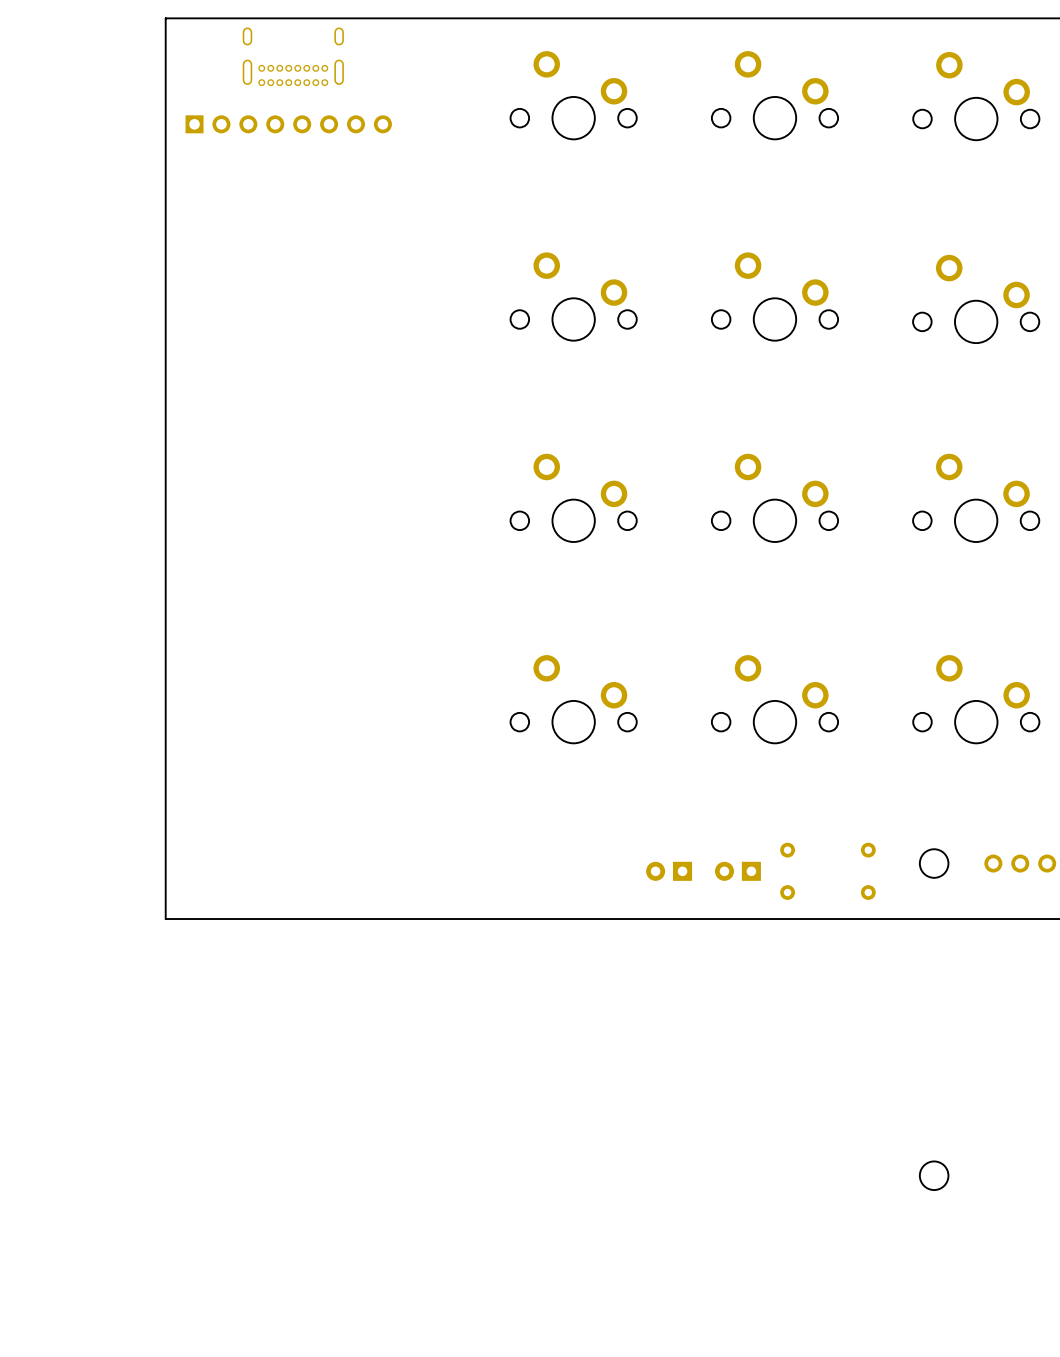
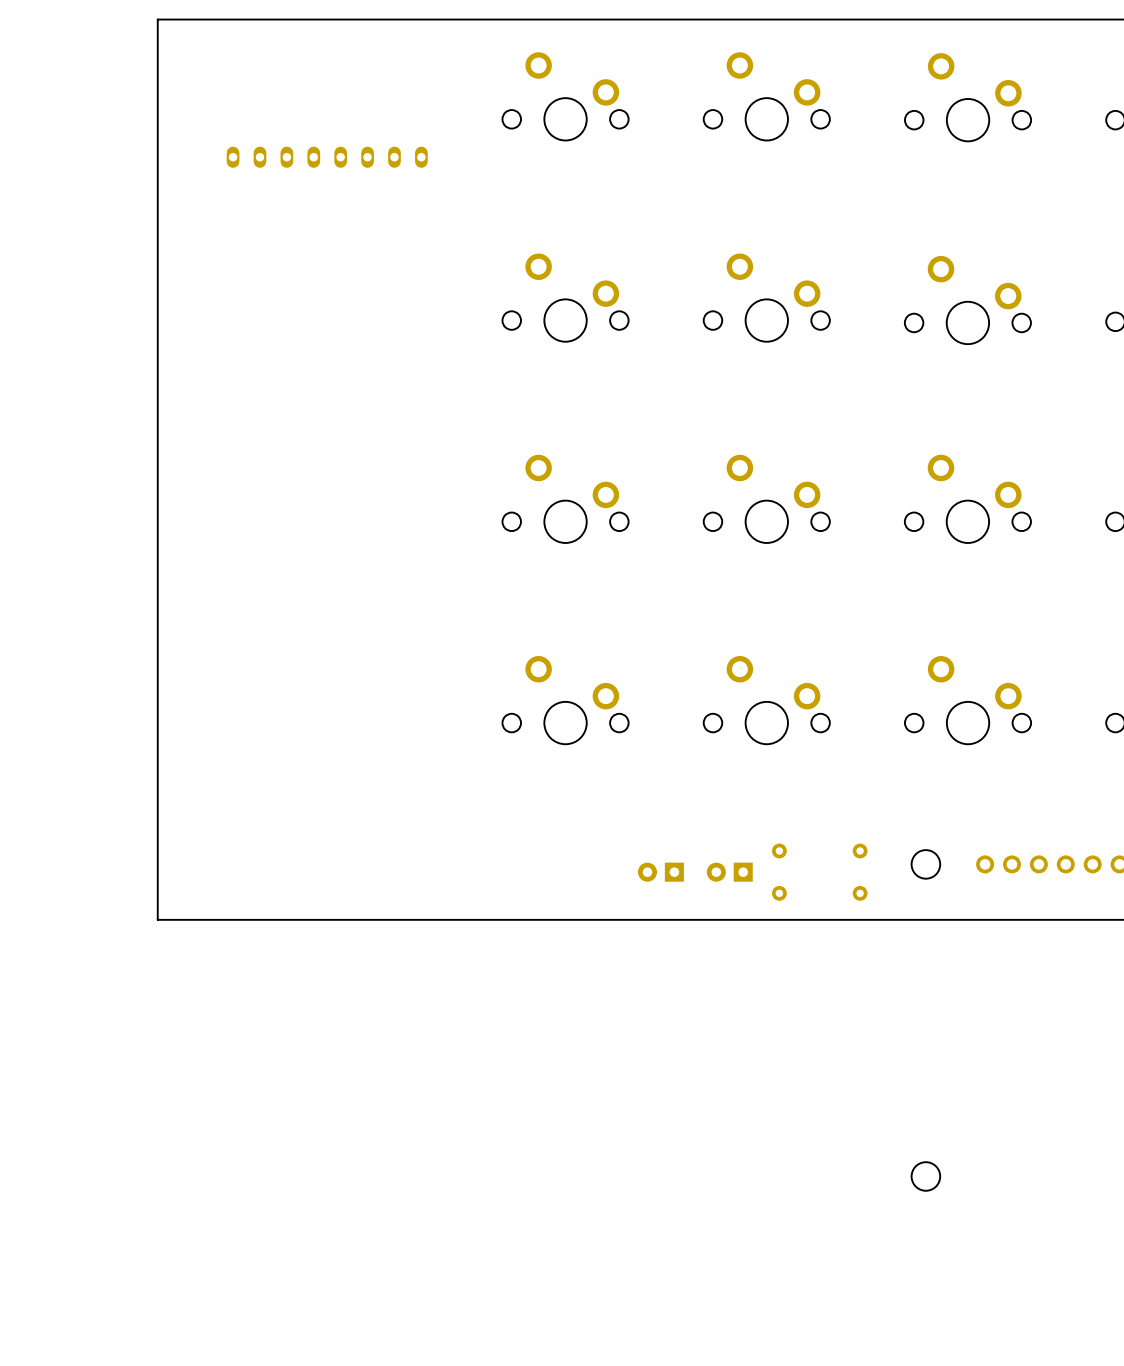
part: (293, 56) -> none
part: (288, 124) -> none
part: none -> (327, 157)

